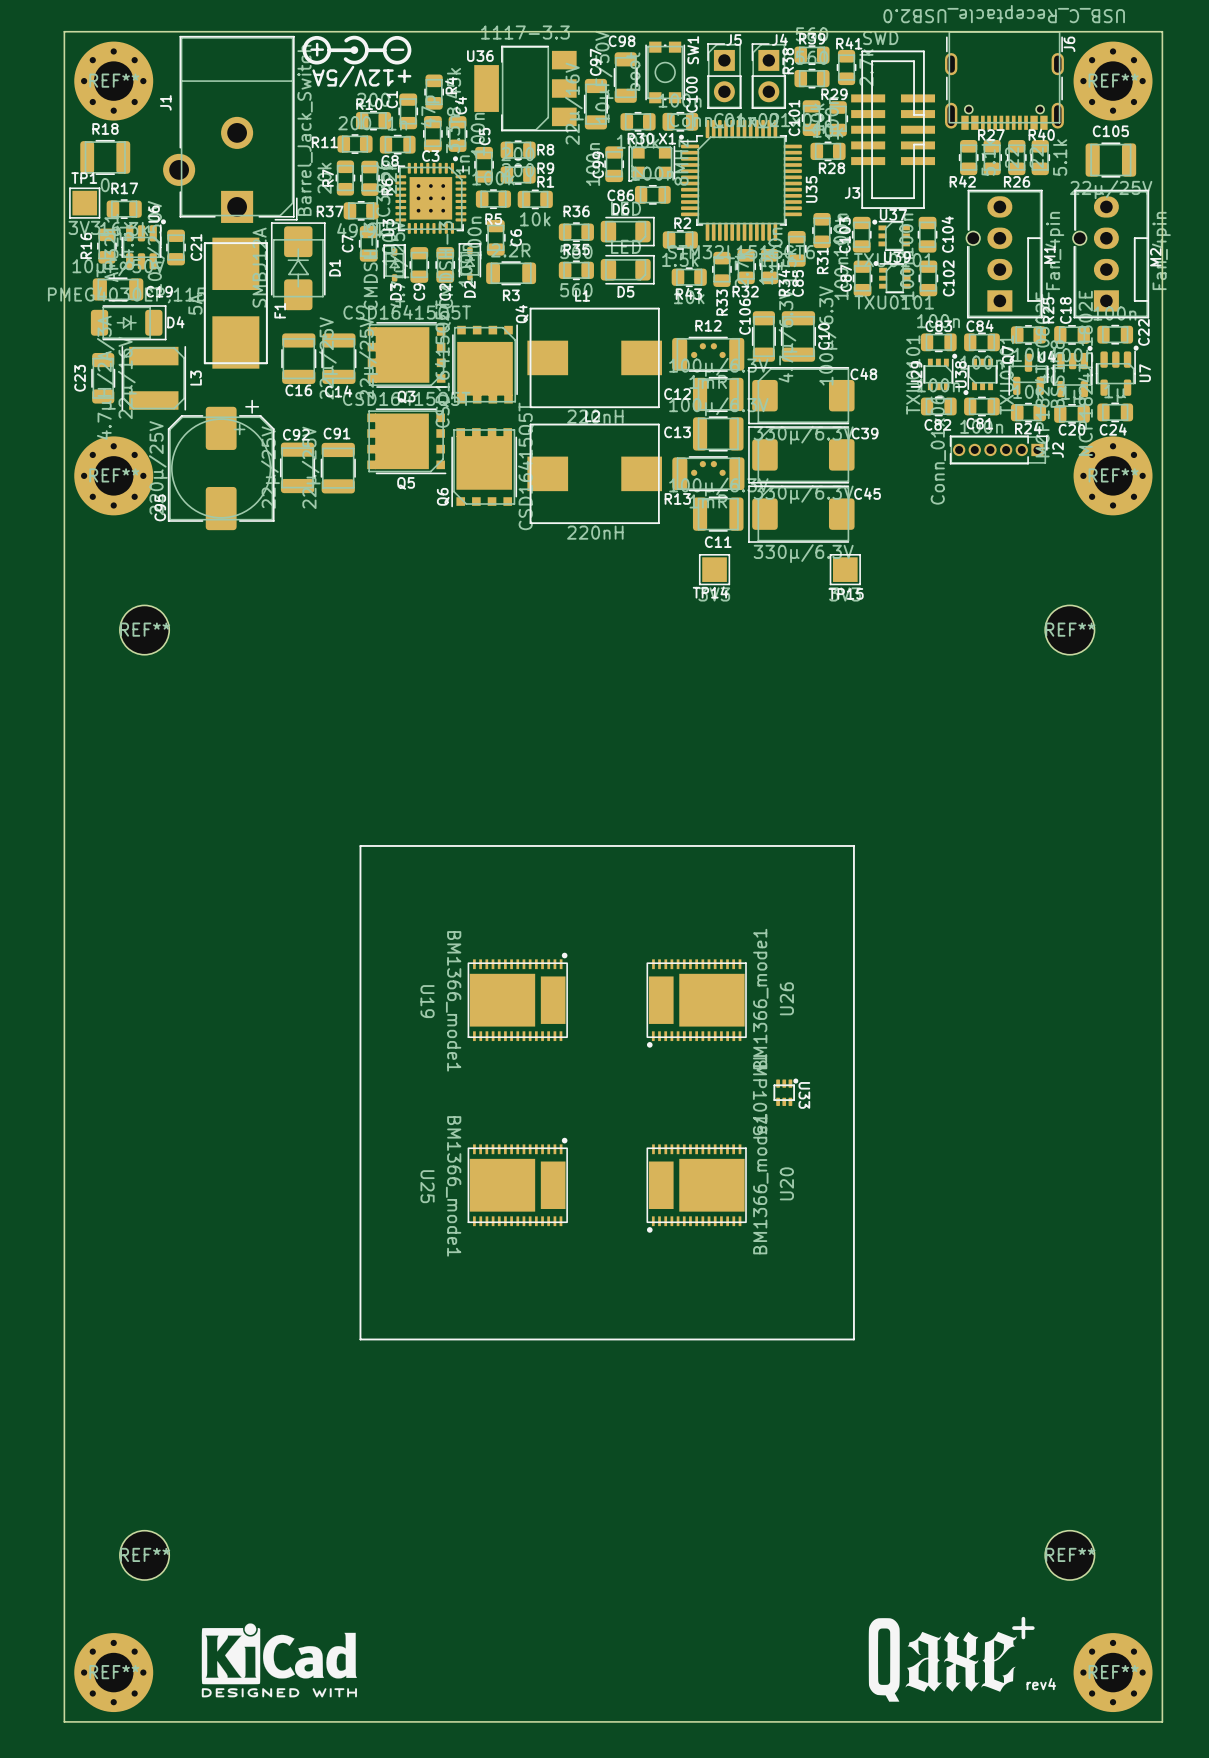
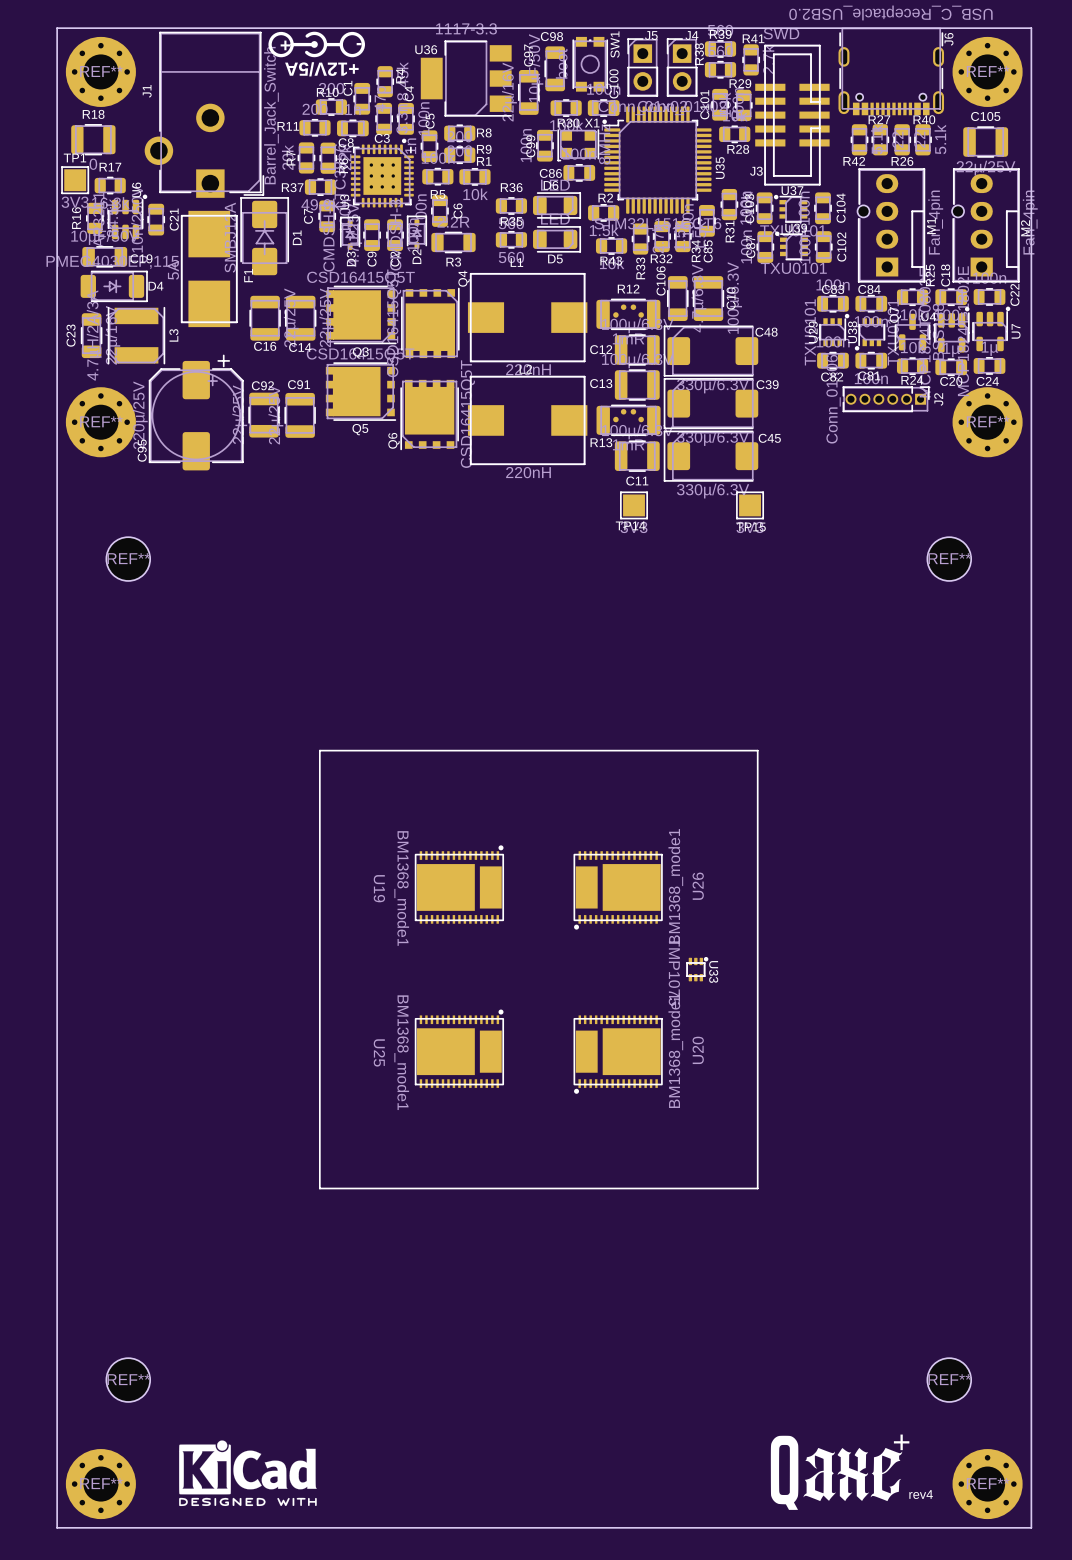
U26 value: BM1366_mode1 (760, 999) -> BM1368_mode1 (675, 886)
U19 value: BM1366_mode1 (453, 1001) -> BM1368_mode1 (401, 888)
U20 value: BM1366_mode1 (760, 1184) -> BM1368_mode1 (675, 1050)
U25 value: BM1366_mode1 (453, 1186) -> BM1368_mode1 (401, 1052)

